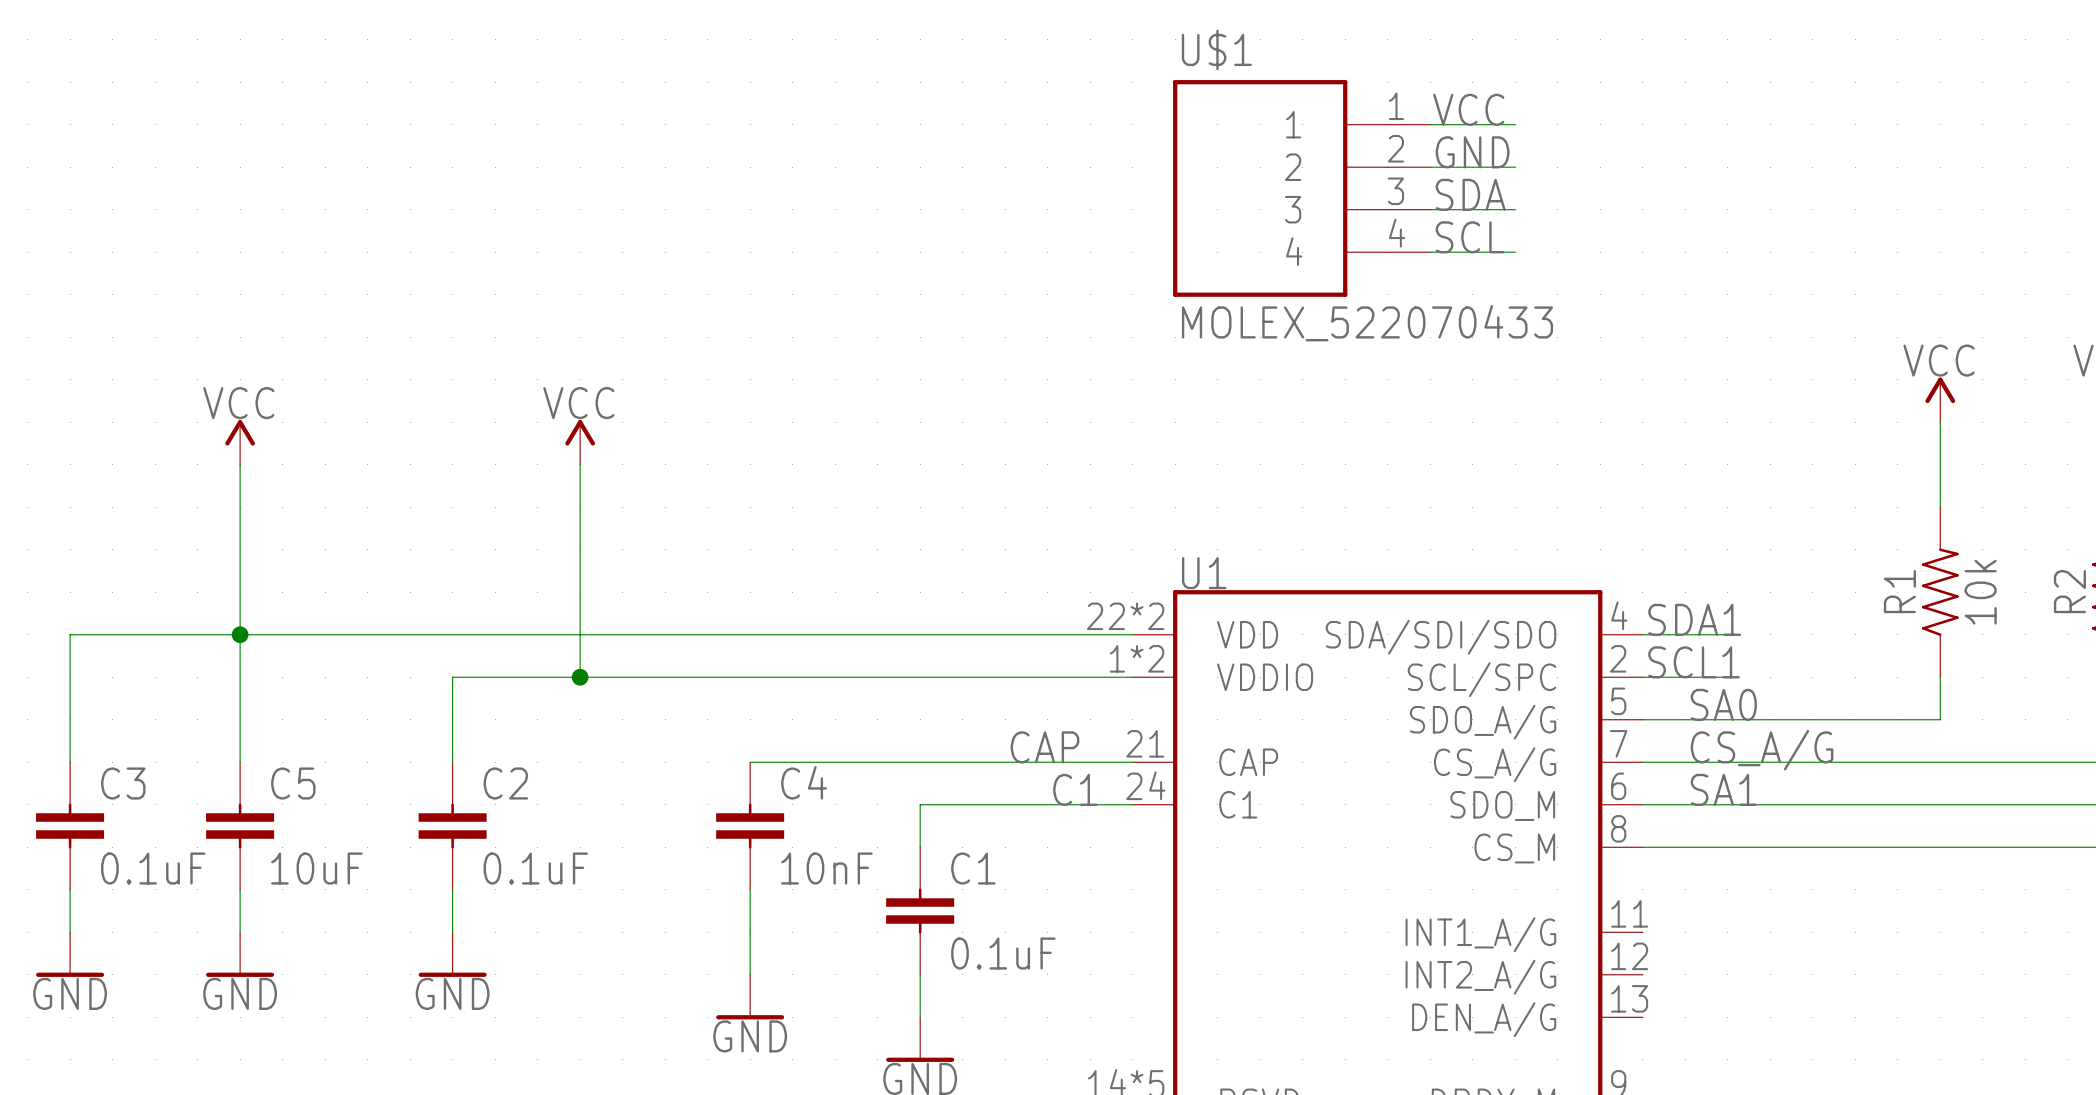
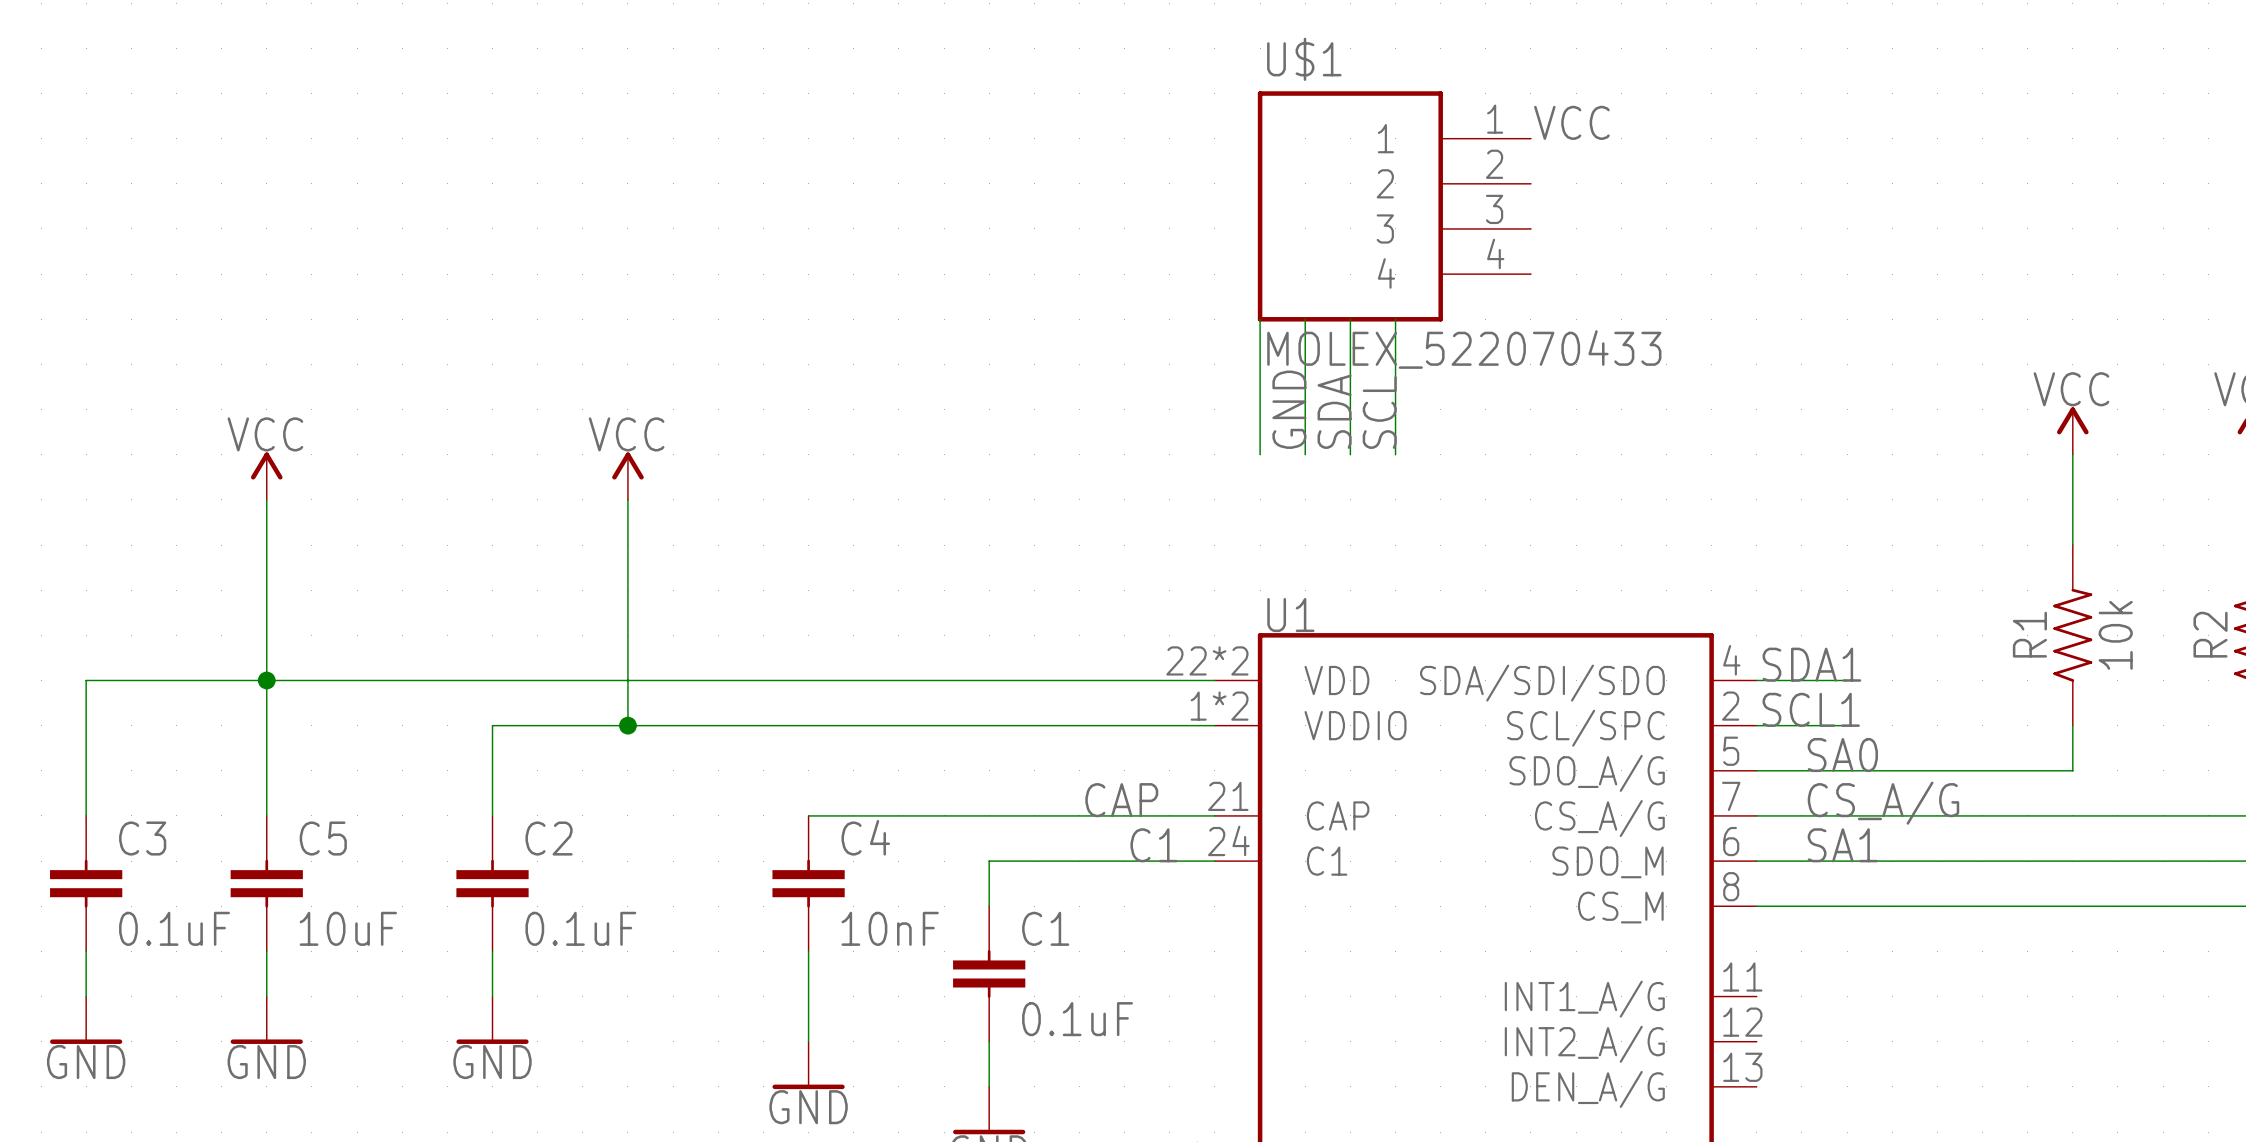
wire: (1430, 124) (1515, 124) -> none
label rotation: 0° (1472, 152) -> 90° counterclockwise (1289, 409)
label position: GND (1472, 152) -> GND (1289, 409)
wire: (1430, 167) (1515, 167) -> none
label rotation: 0° (1470, 194) -> 90° counterclockwise (1334, 411)
label position: SDA (1470, 194) -> SDA (1334, 411)
wire: (1430, 209) (1515, 209) -> none
label rotation: 0° (1470, 237) -> 90° counterclockwise (1379, 412)
label position: SCL (1470, 237) -> SCL (1379, 412)
wire: (1430, 252) (1515, 252) -> none
wire: none -> (1260, 319) (1260, 454)
wire: none -> (1305, 319) (1305, 454)
wire: none -> (1350, 319) (1350, 454)
wire: none -> (1395, 319) (1395, 454)

